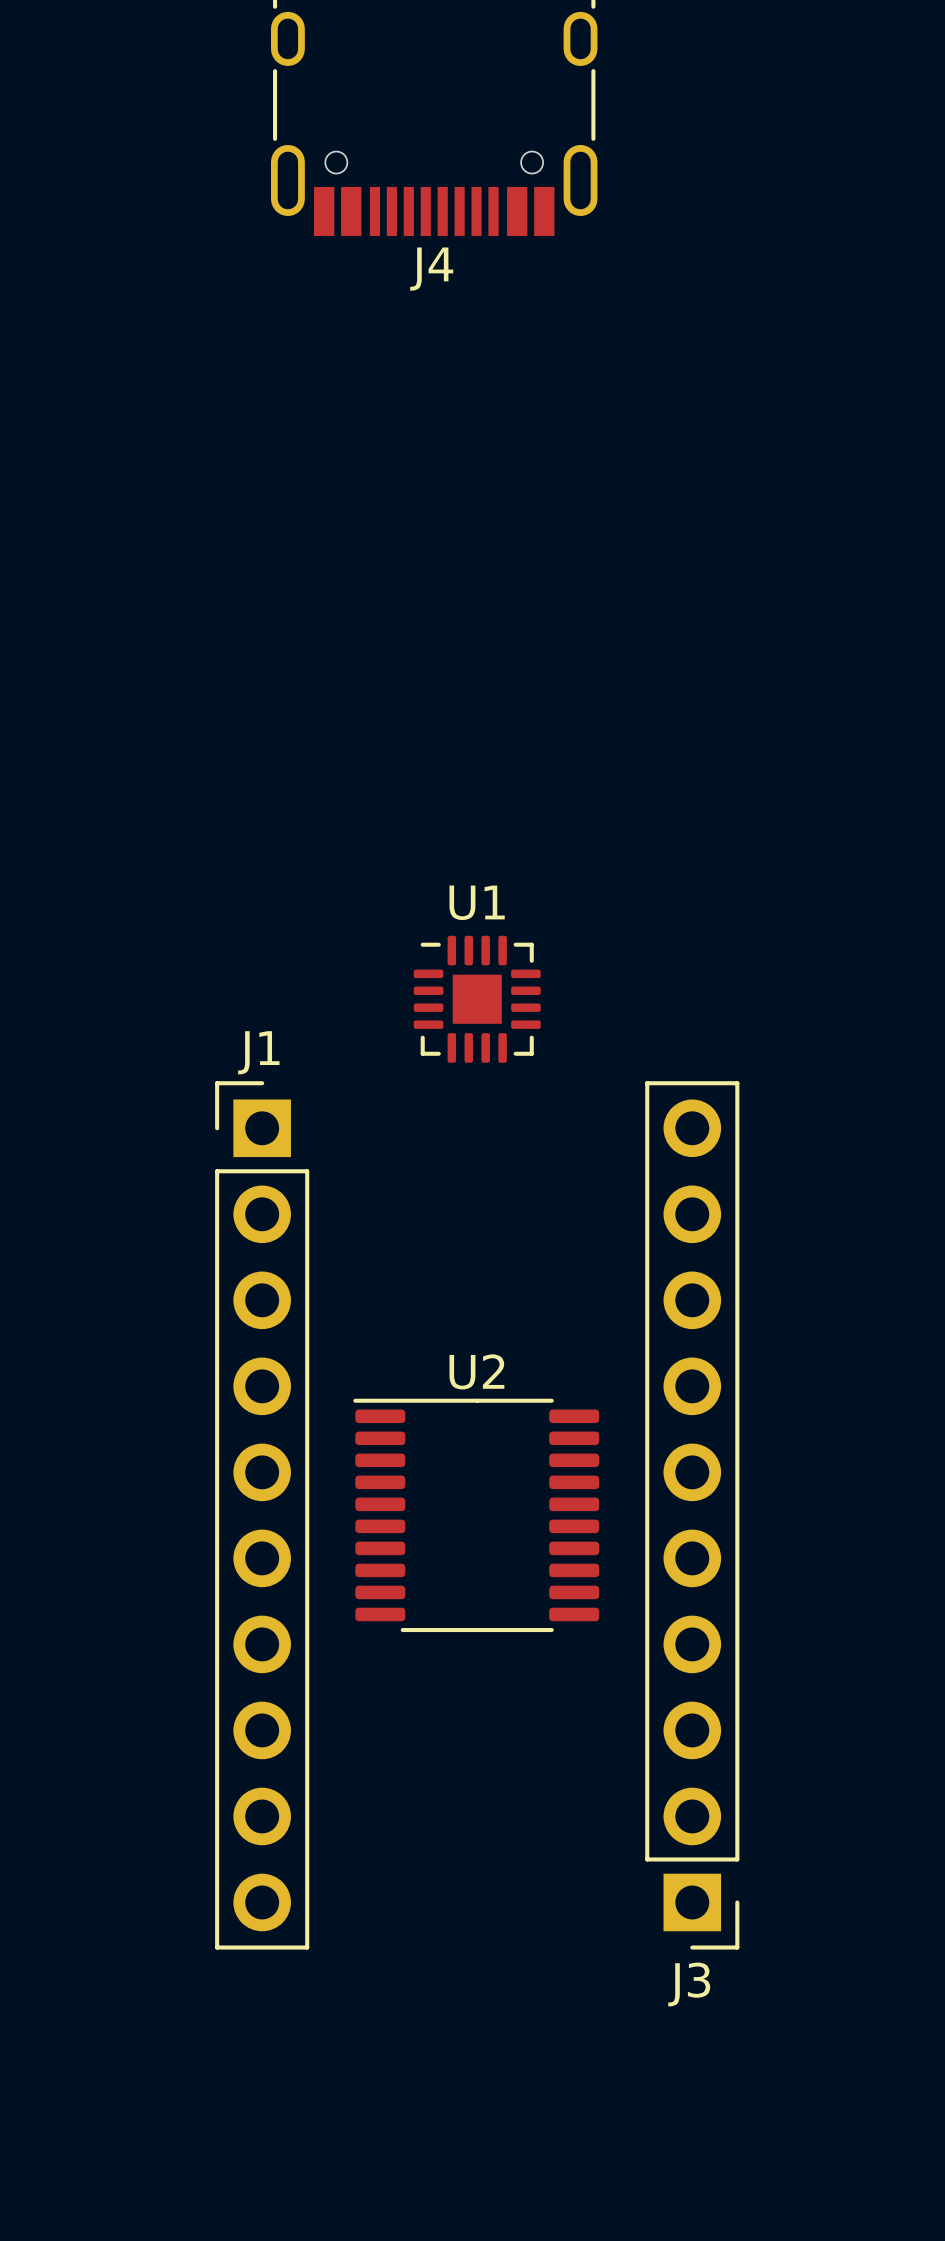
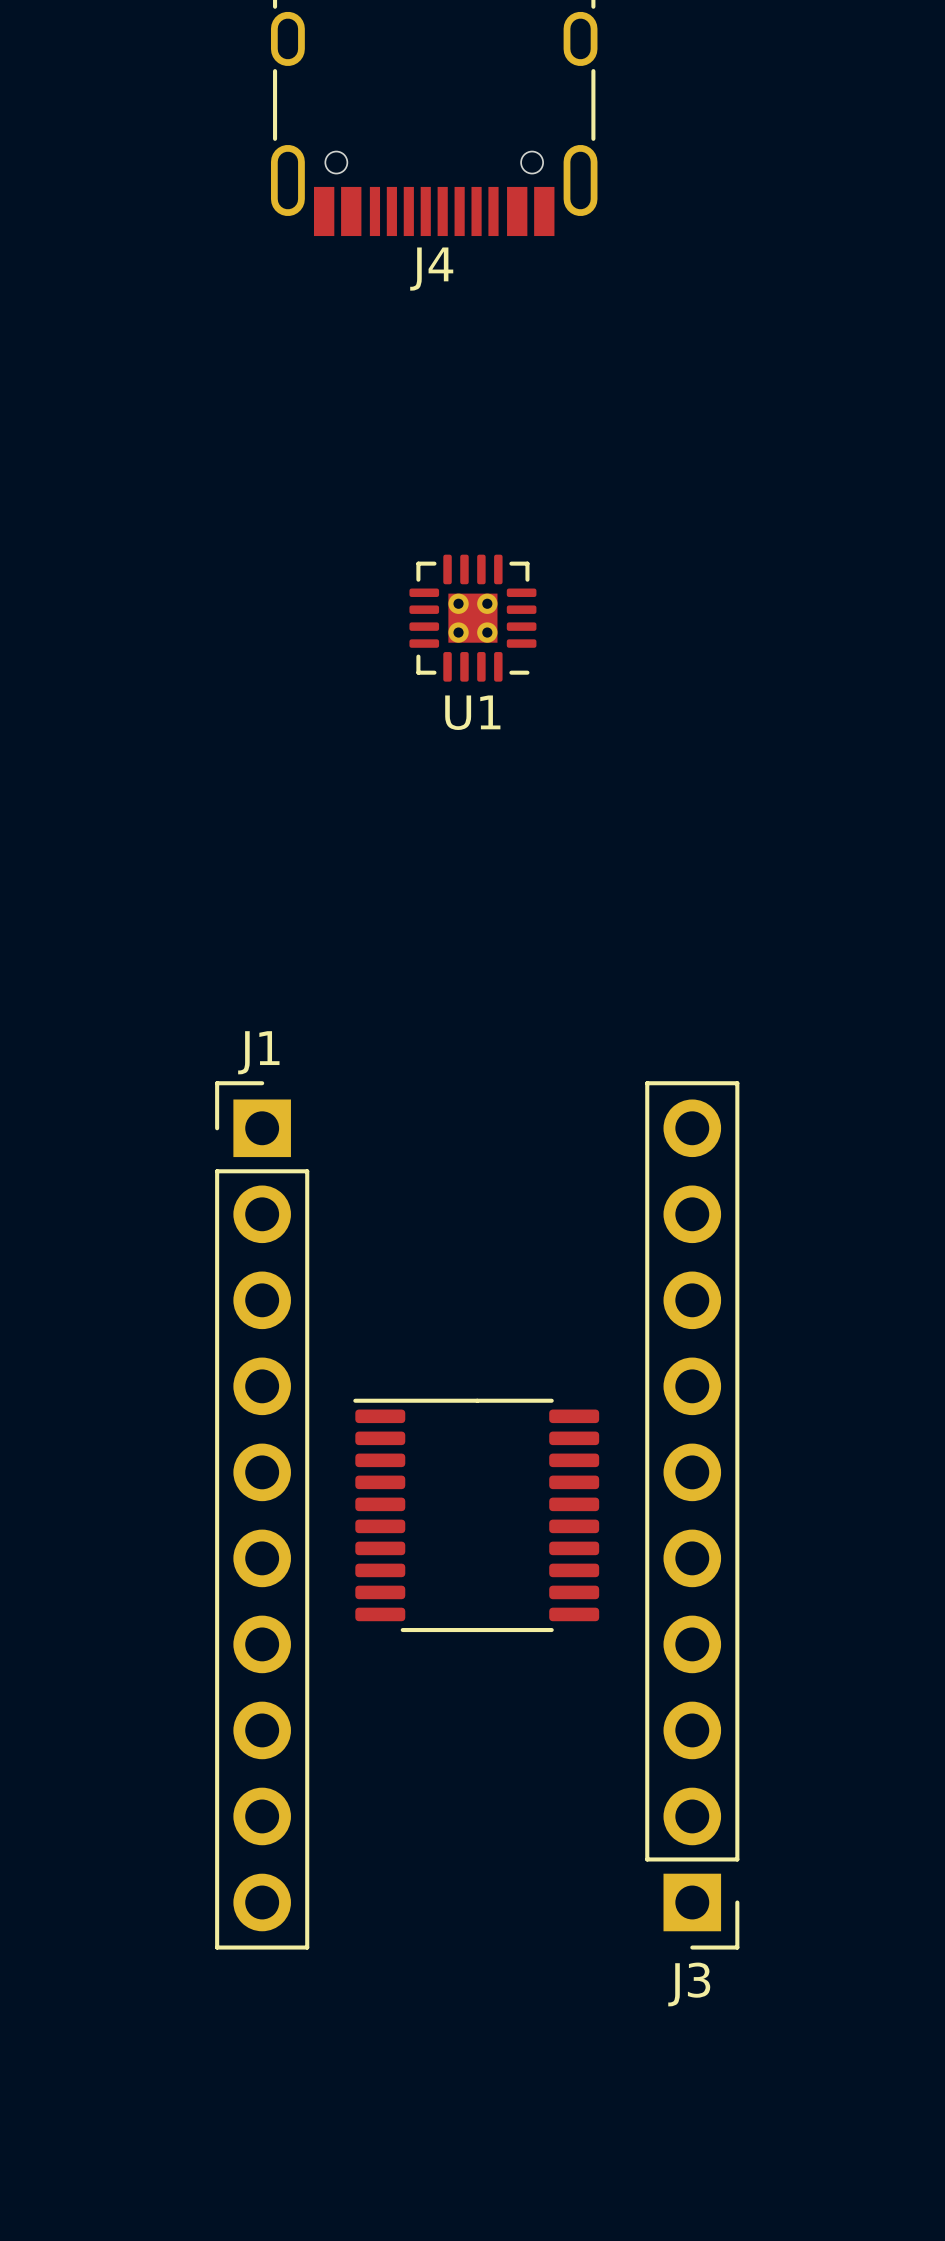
U1 name position: U1 (477, 902) -> U1 (472, 712)
U1 footprint: [413, 935, 541, 1063] -> [409, 554, 537, 682]
U2 name: U2 (476, 1371) -> none

